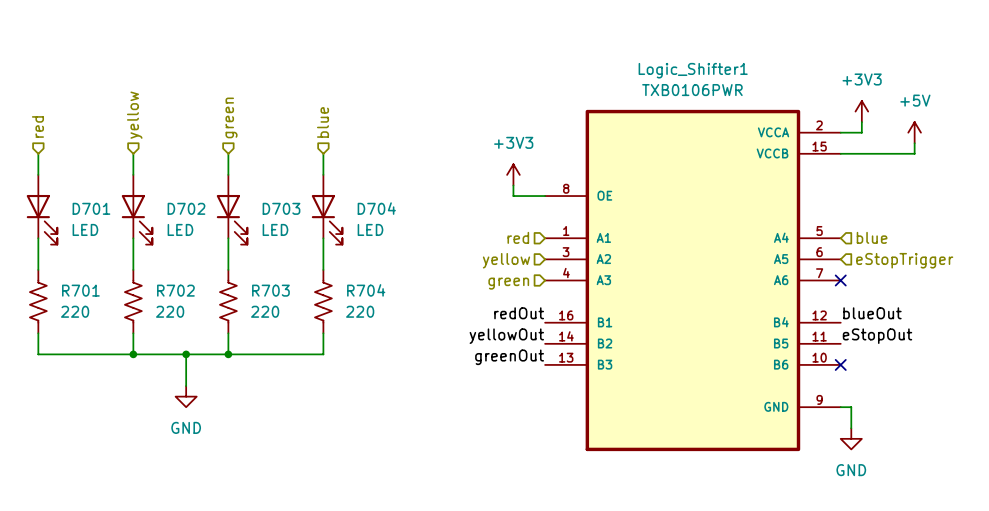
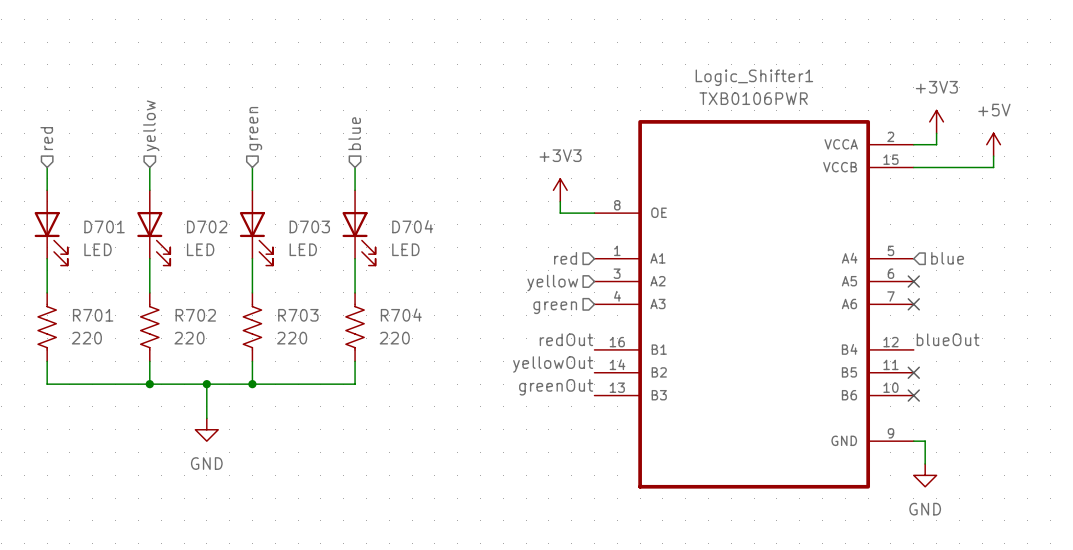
no-connect mark: none -> (913, 281)
hierarchical label: eStopTrigger (904, 260) -> none
label: eStopOut (877, 336) -> none
no-connect mark: none -> (913, 372)

